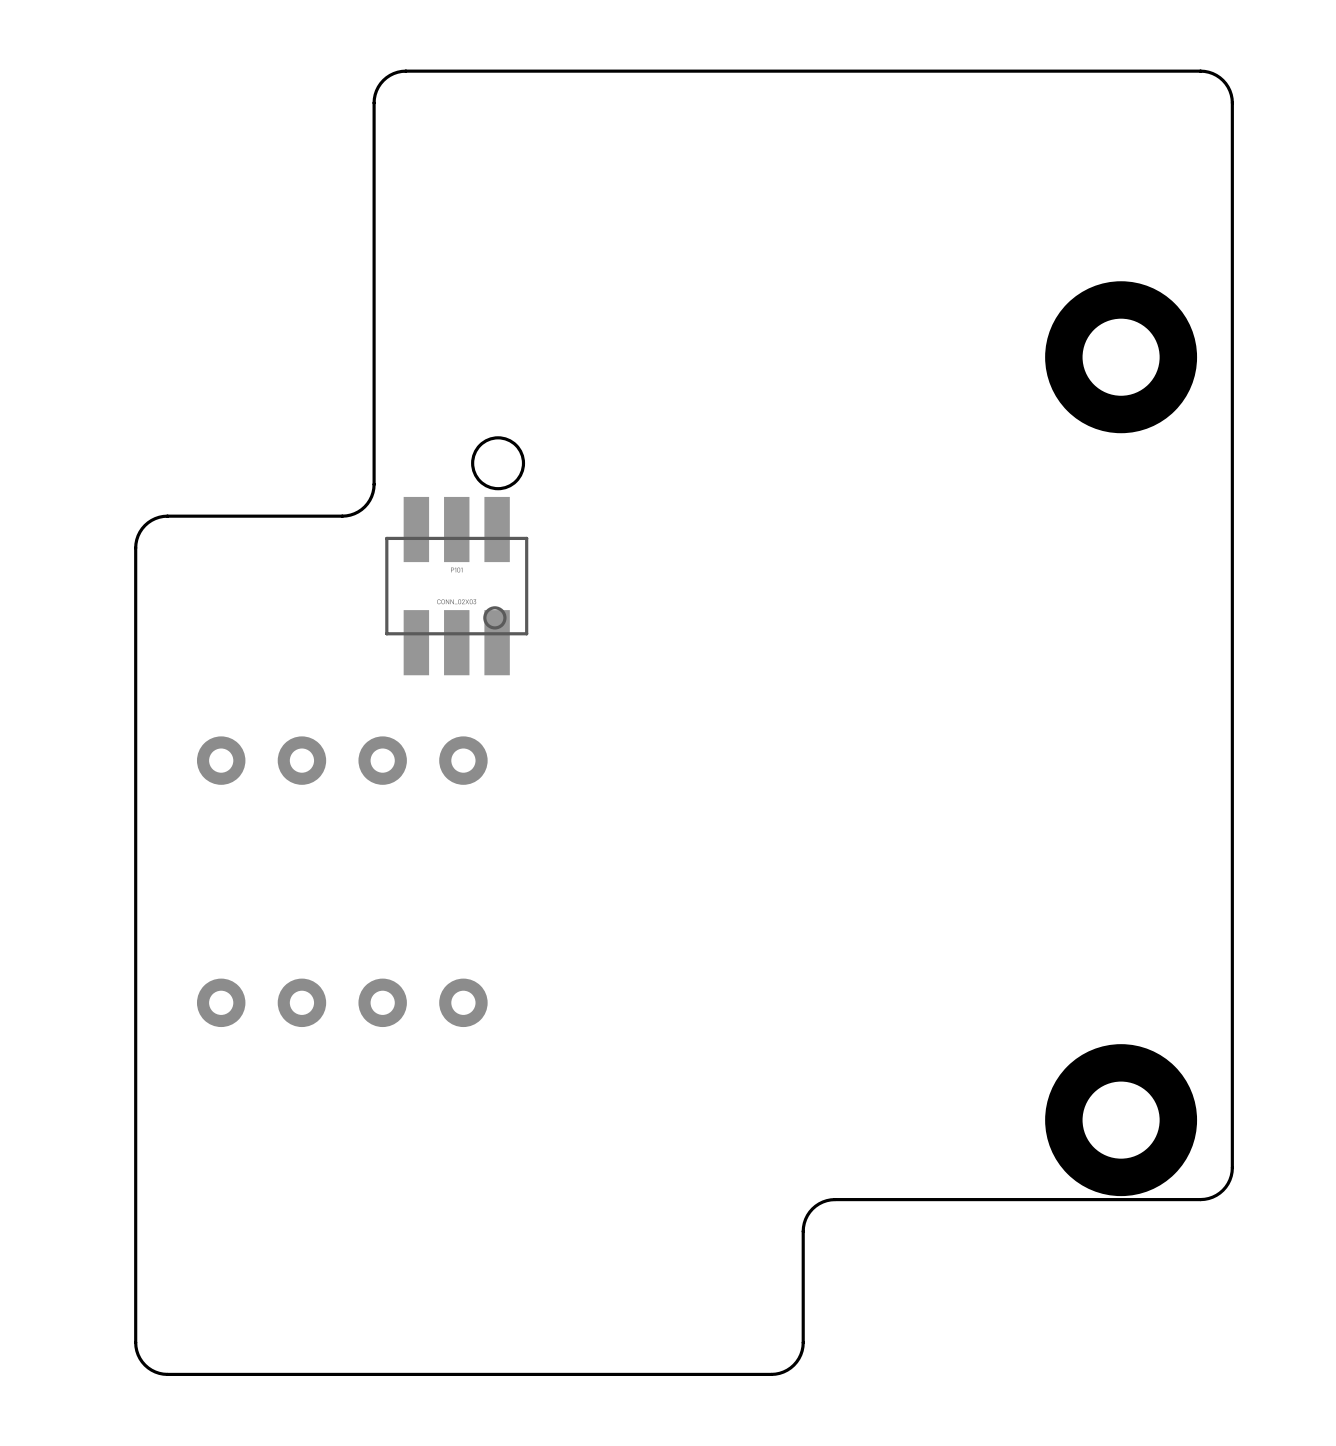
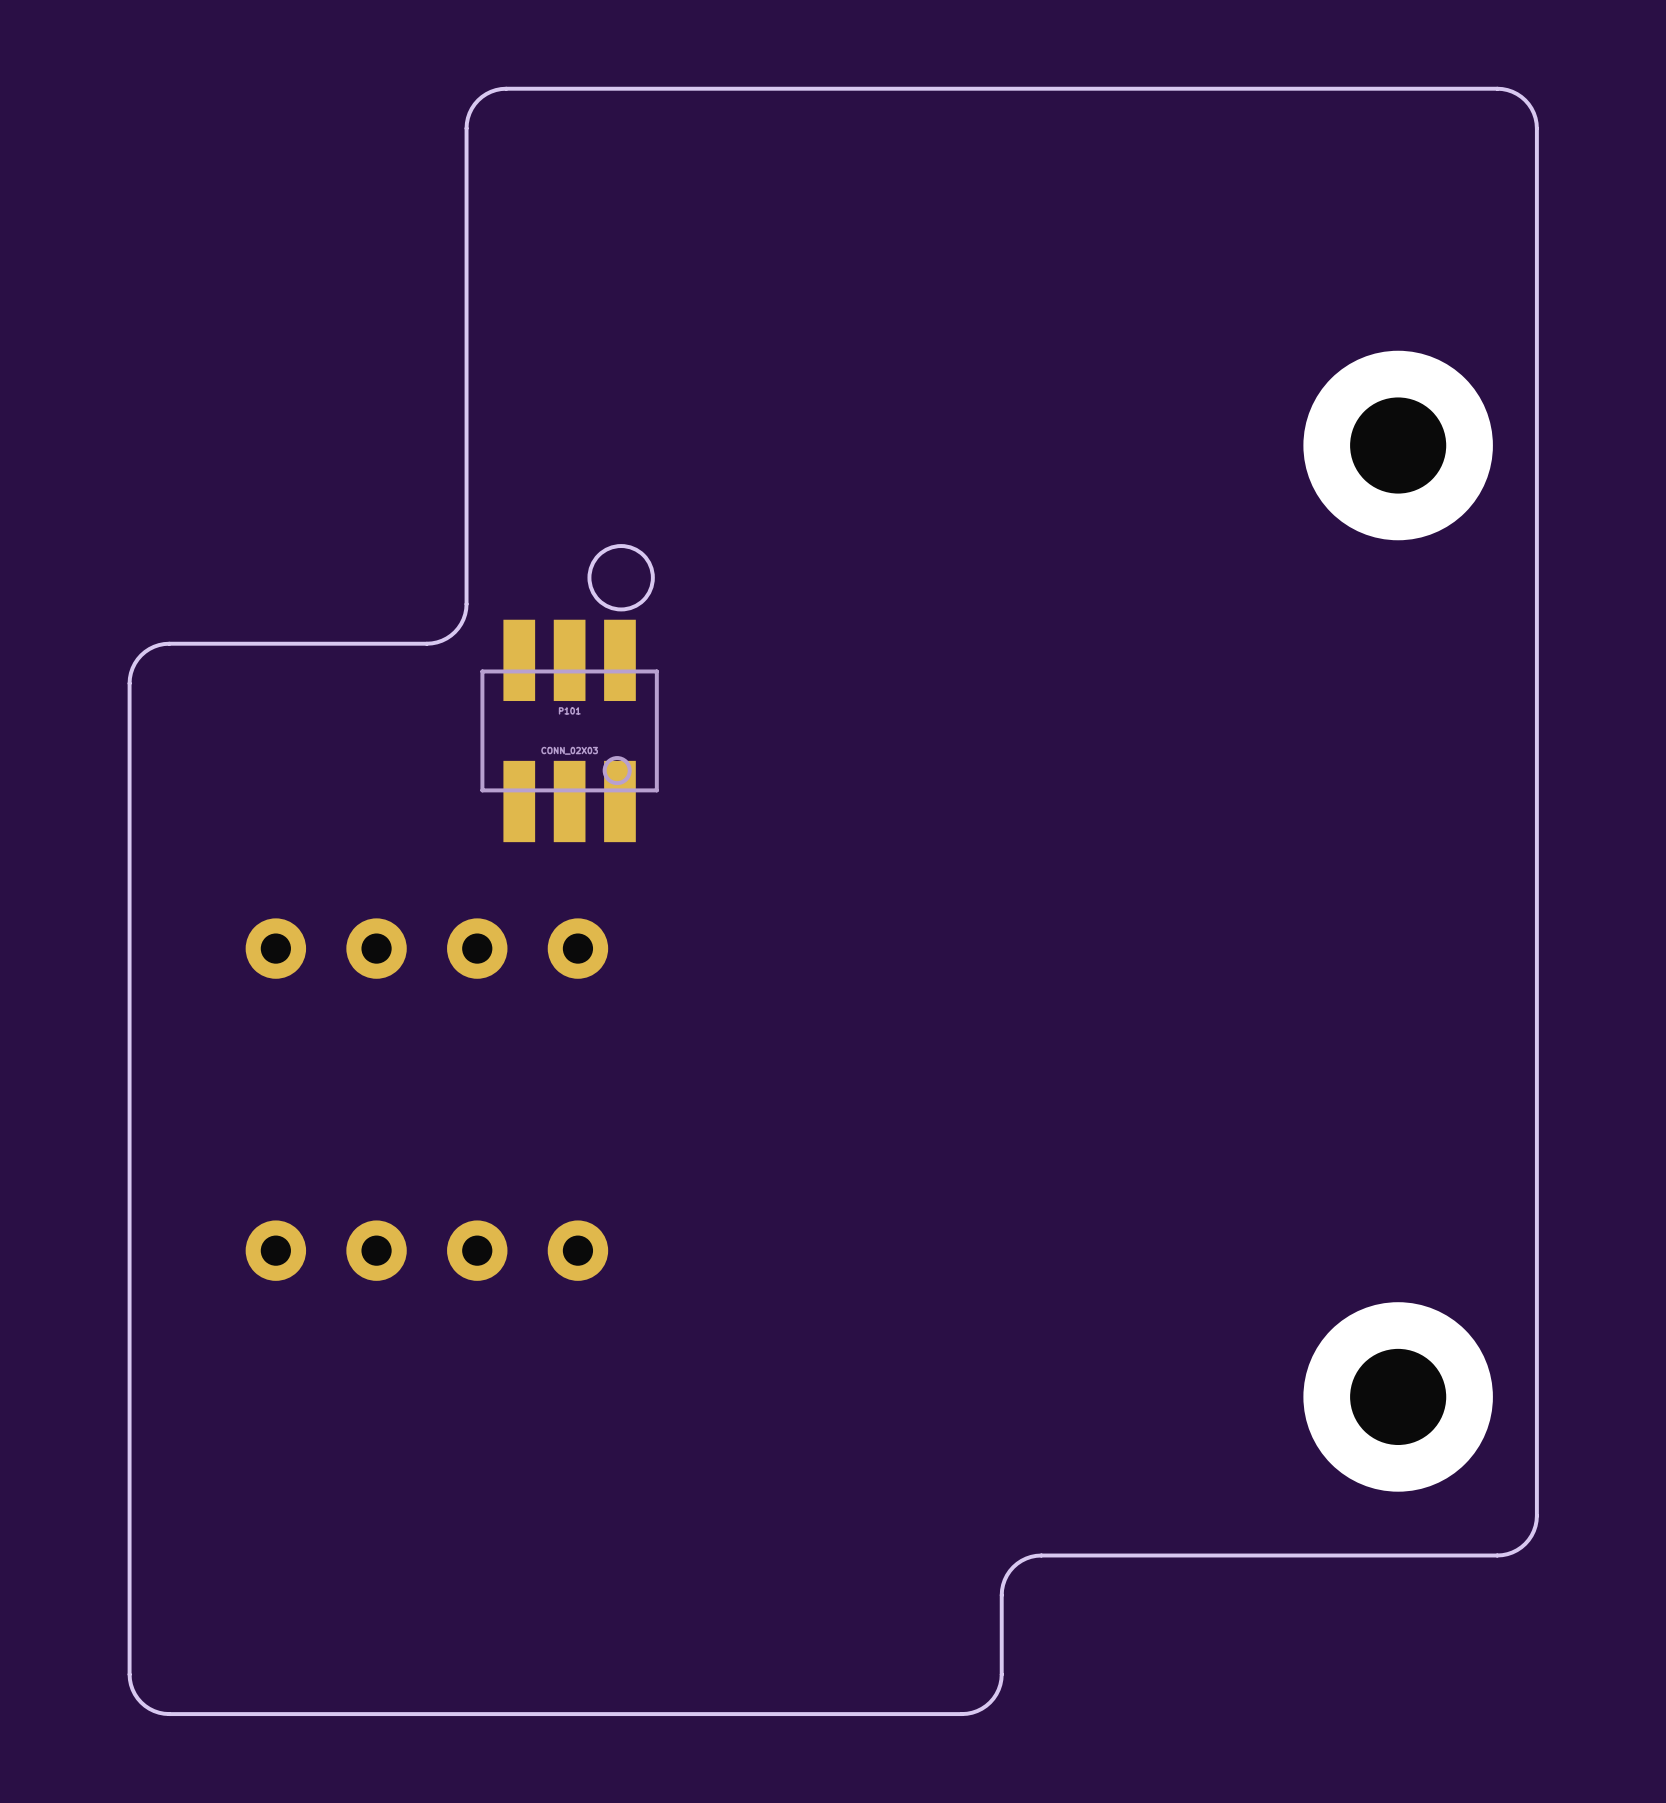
board edge: (167, 516) (155, 518) (145, 525) (138, 535) (135, 547) (135, 1342) (138, 1354) (145, 1365) (155, 1372) (167, 1374) -> (208, 643) (164, 644) (149, 649) (134, 663) (129, 683) (129, 1679) (137, 1698) (154, 1711) (169, 1714) (208, 1714)
board edge: (1232, 1167) (1231, 1176) (1225, 1187) (1216, 1195) (1204, 1199) (826, 1200) (812, 1208) (804, 1223) (803, 1279) -> (1536, 1456) (1535, 1526) (1525, 1543) (1507, 1554) (1036, 1555) (1021, 1560) (1009, 1571) (1003, 1584) (1001, 1595)

